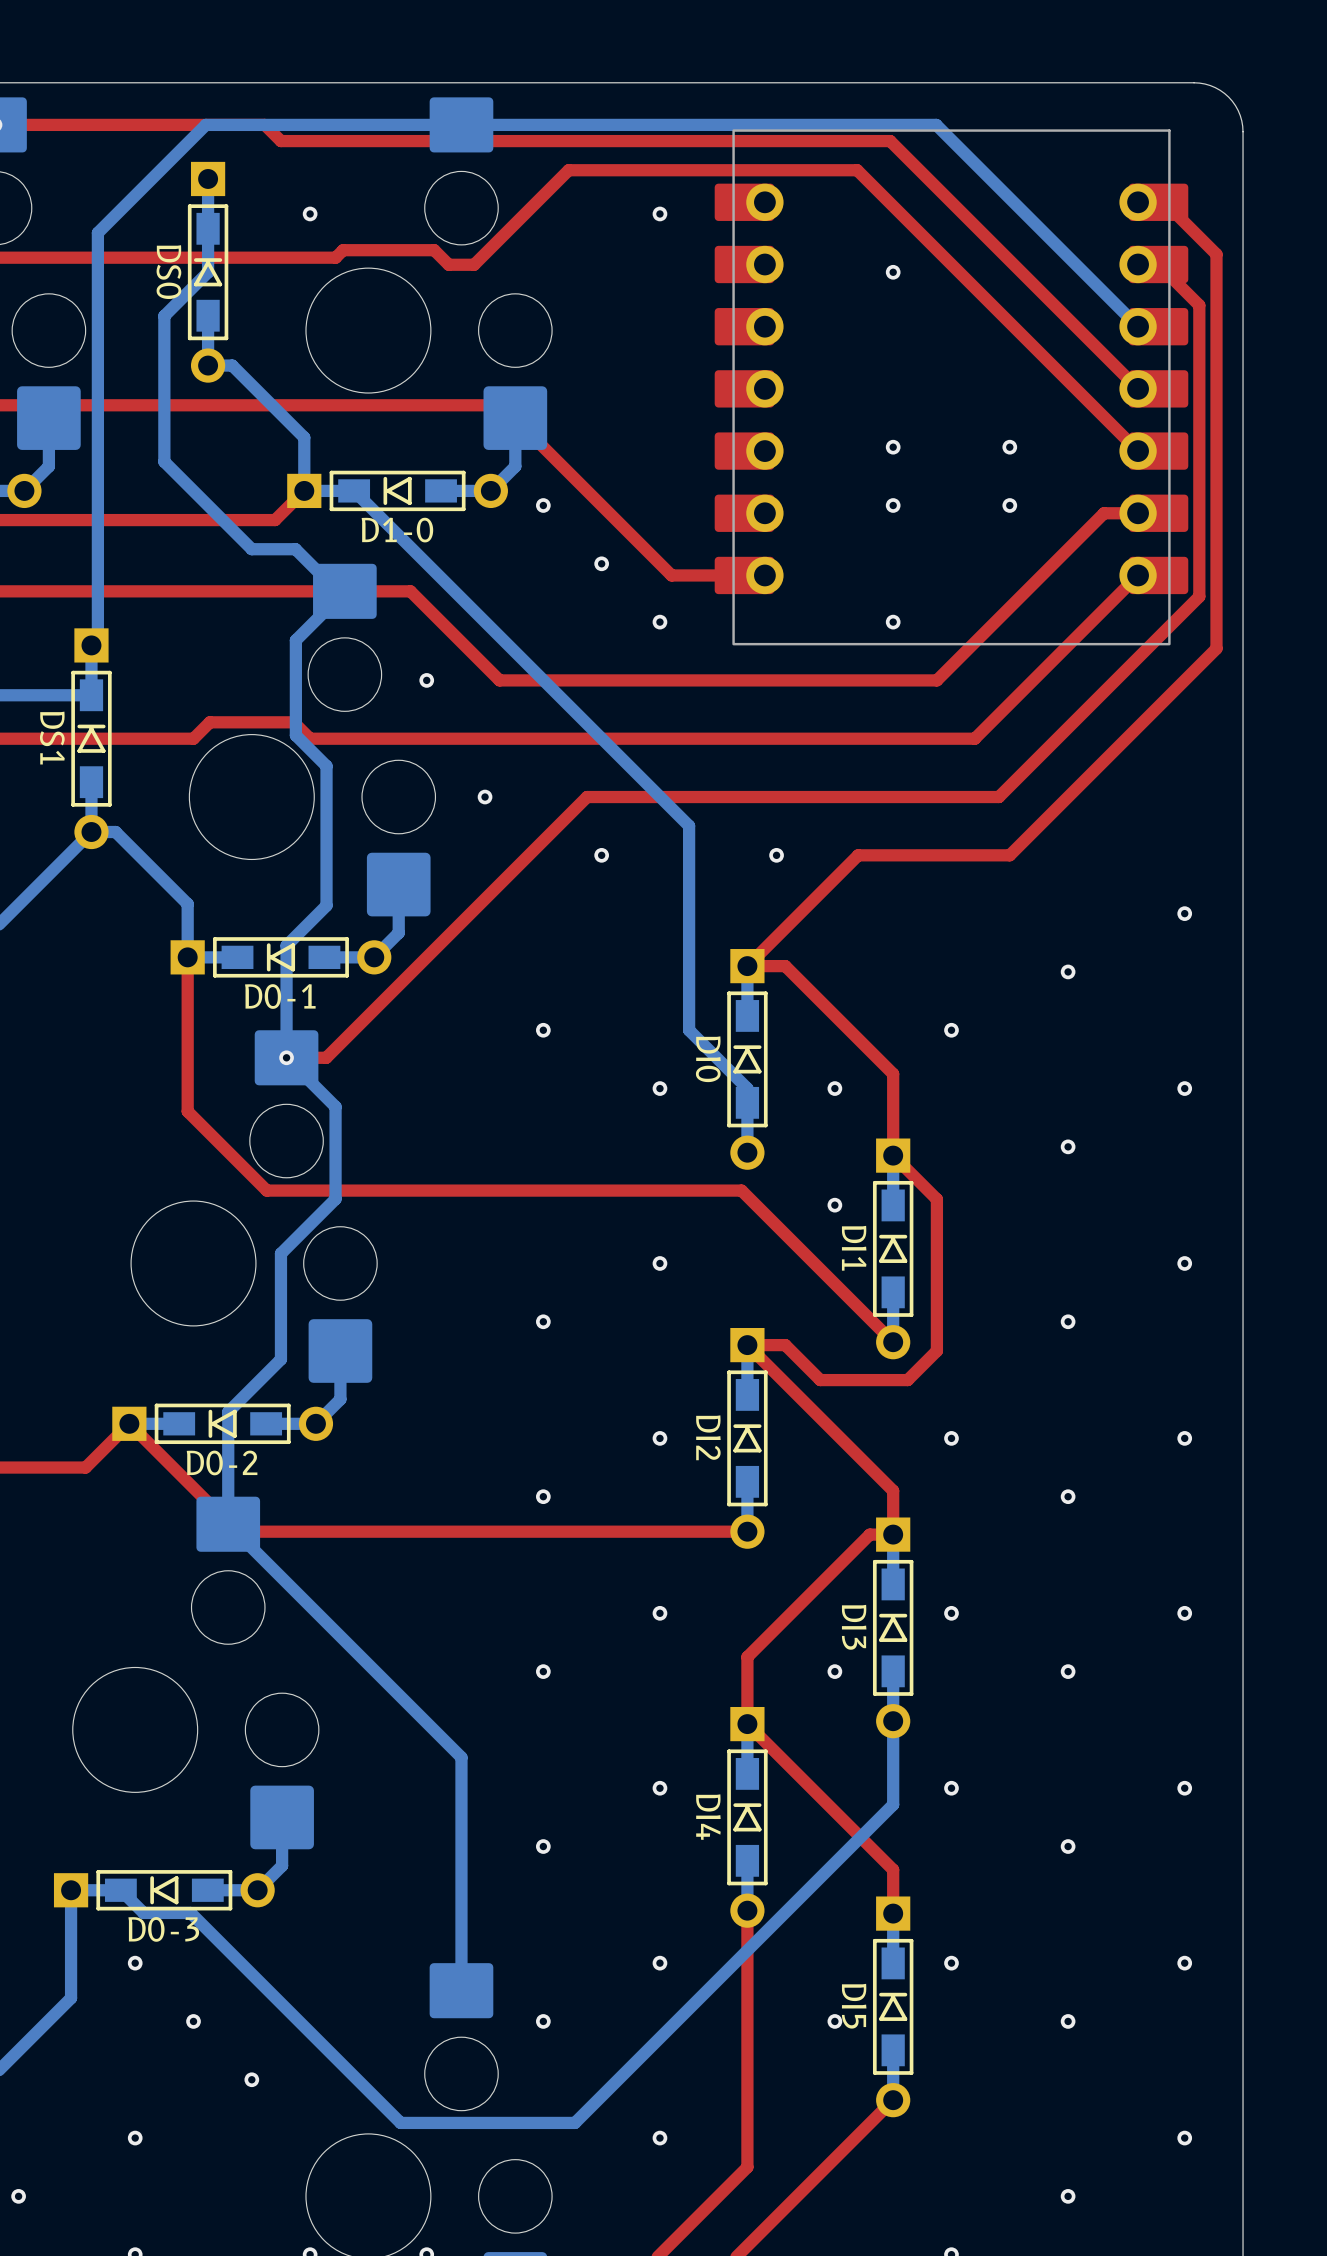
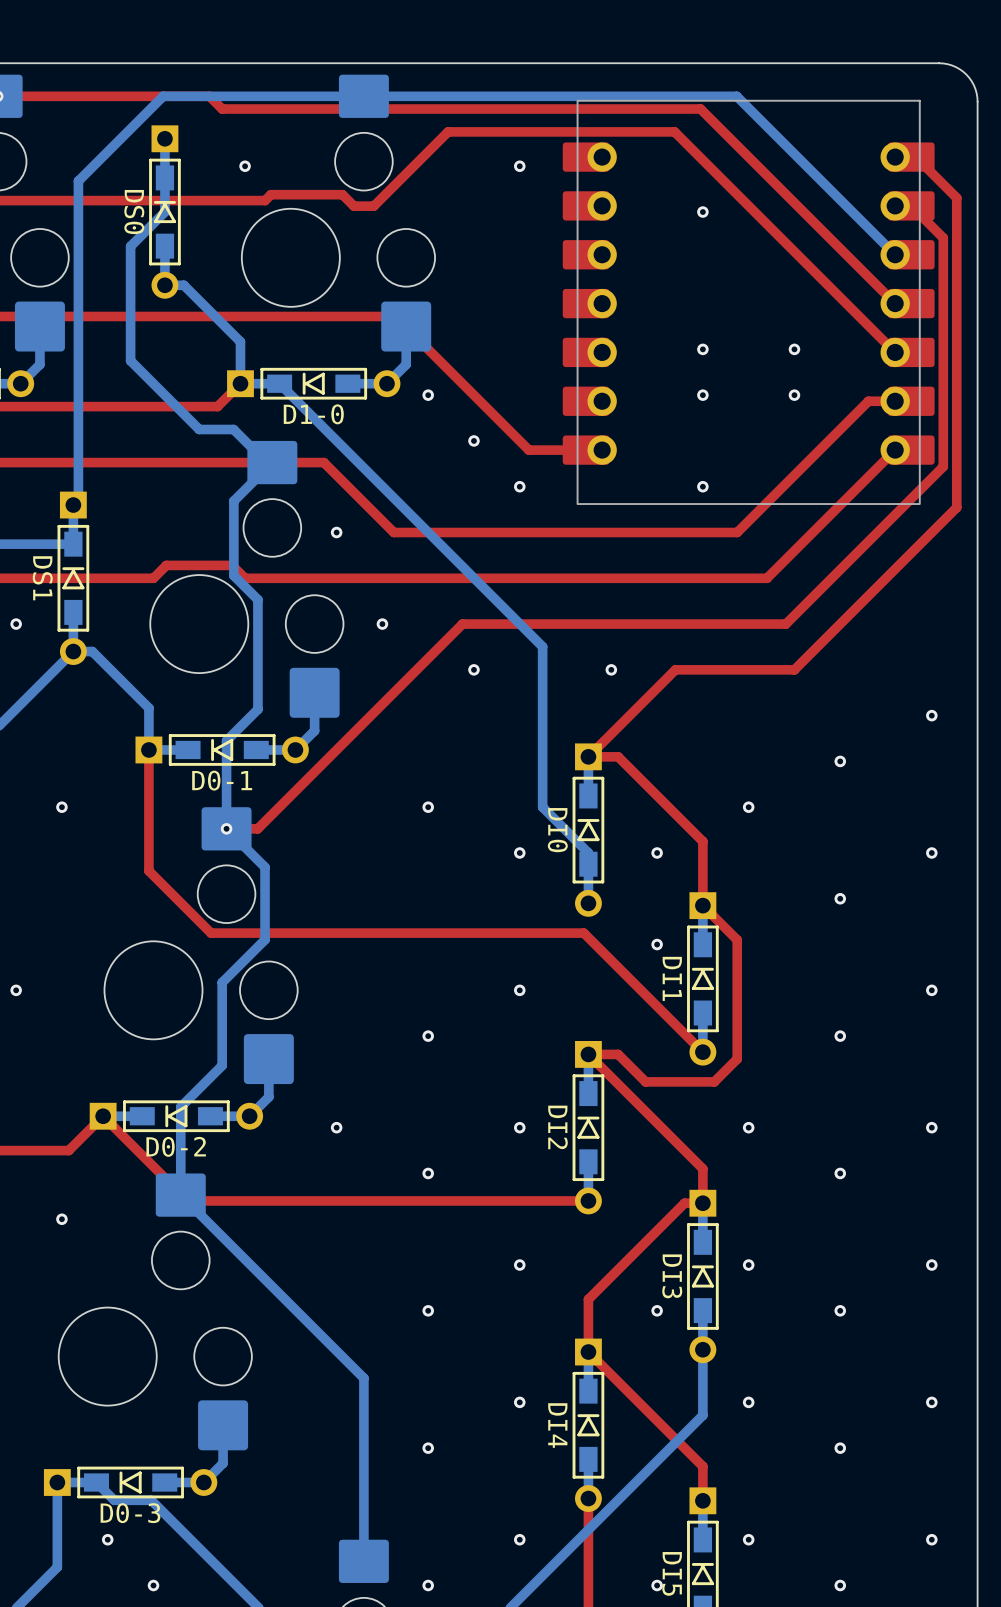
via: none -> (16, 624)
via: none -> (61, 807)
via: none -> (16, 990)
via: none -> (336, 1127)
via: none -> (61, 1219)

